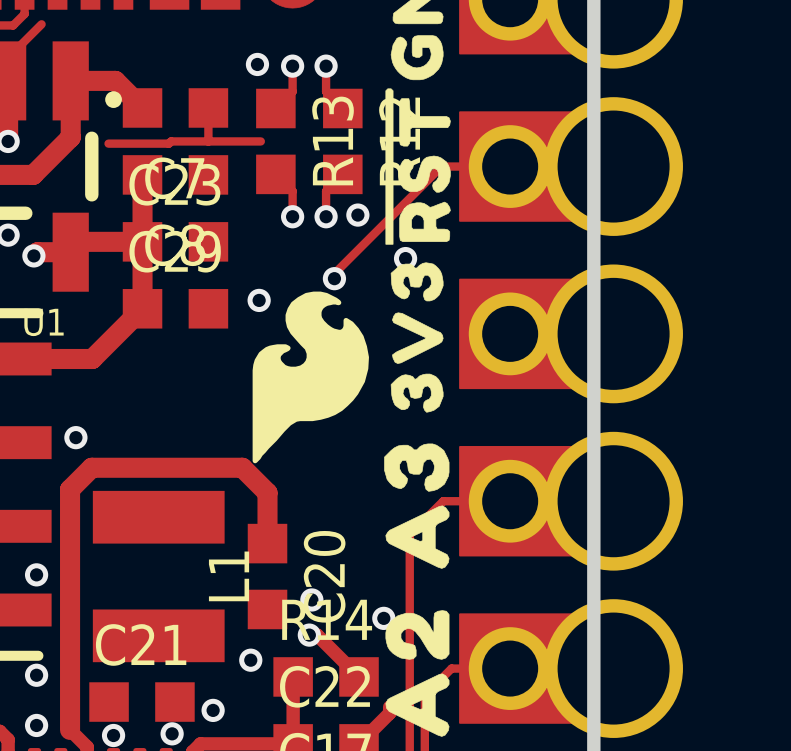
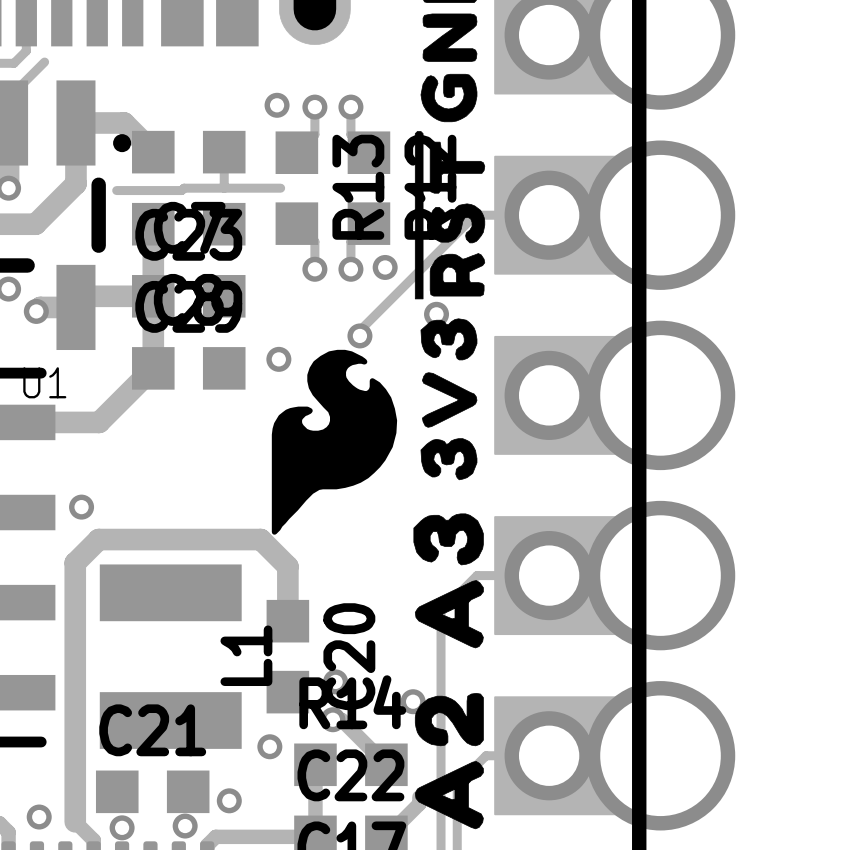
via: (36, 574) -> none
via: (36, 675) -> none

